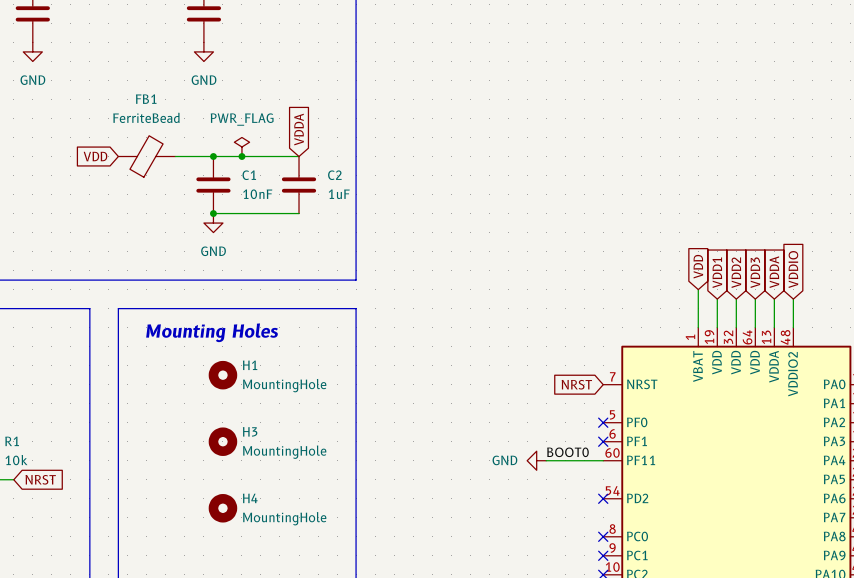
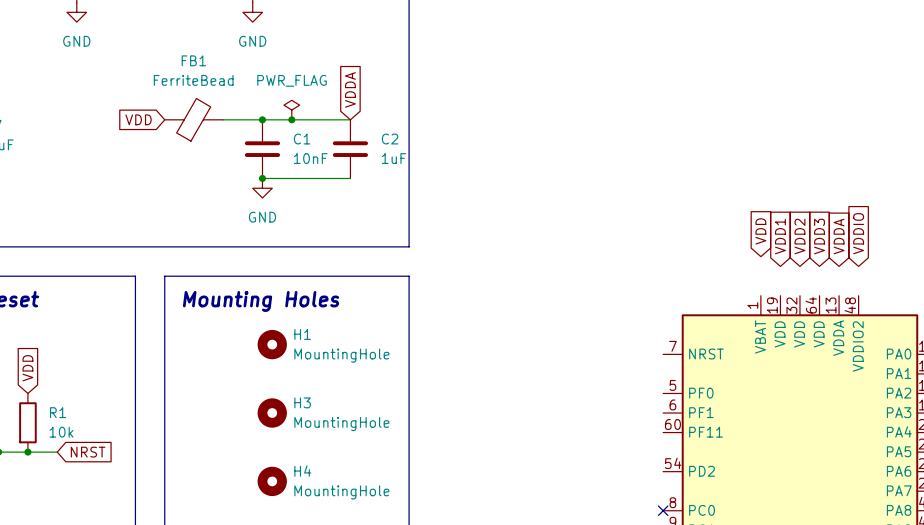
wire: (698, 289) (698, 327) -> none
wire: (717, 299) (717, 327) -> none
wire: (736, 299) (736, 327) -> none
wire: (755, 299) (755, 327) -> none
wire: (774, 299) (774, 327) -> none
wire: (793, 299) (793, 327) -> none
global label: NRST (576, 384) -> none
no-connect mark: (603, 422) -> none
no-connect mark: (603, 441) -> none
label: BOOT0 (567, 452) -> none
power symbol: GND (536, 460) -> none
wire: (546, 460) (603, 460) -> none
no-connect mark: (603, 498) -> none

